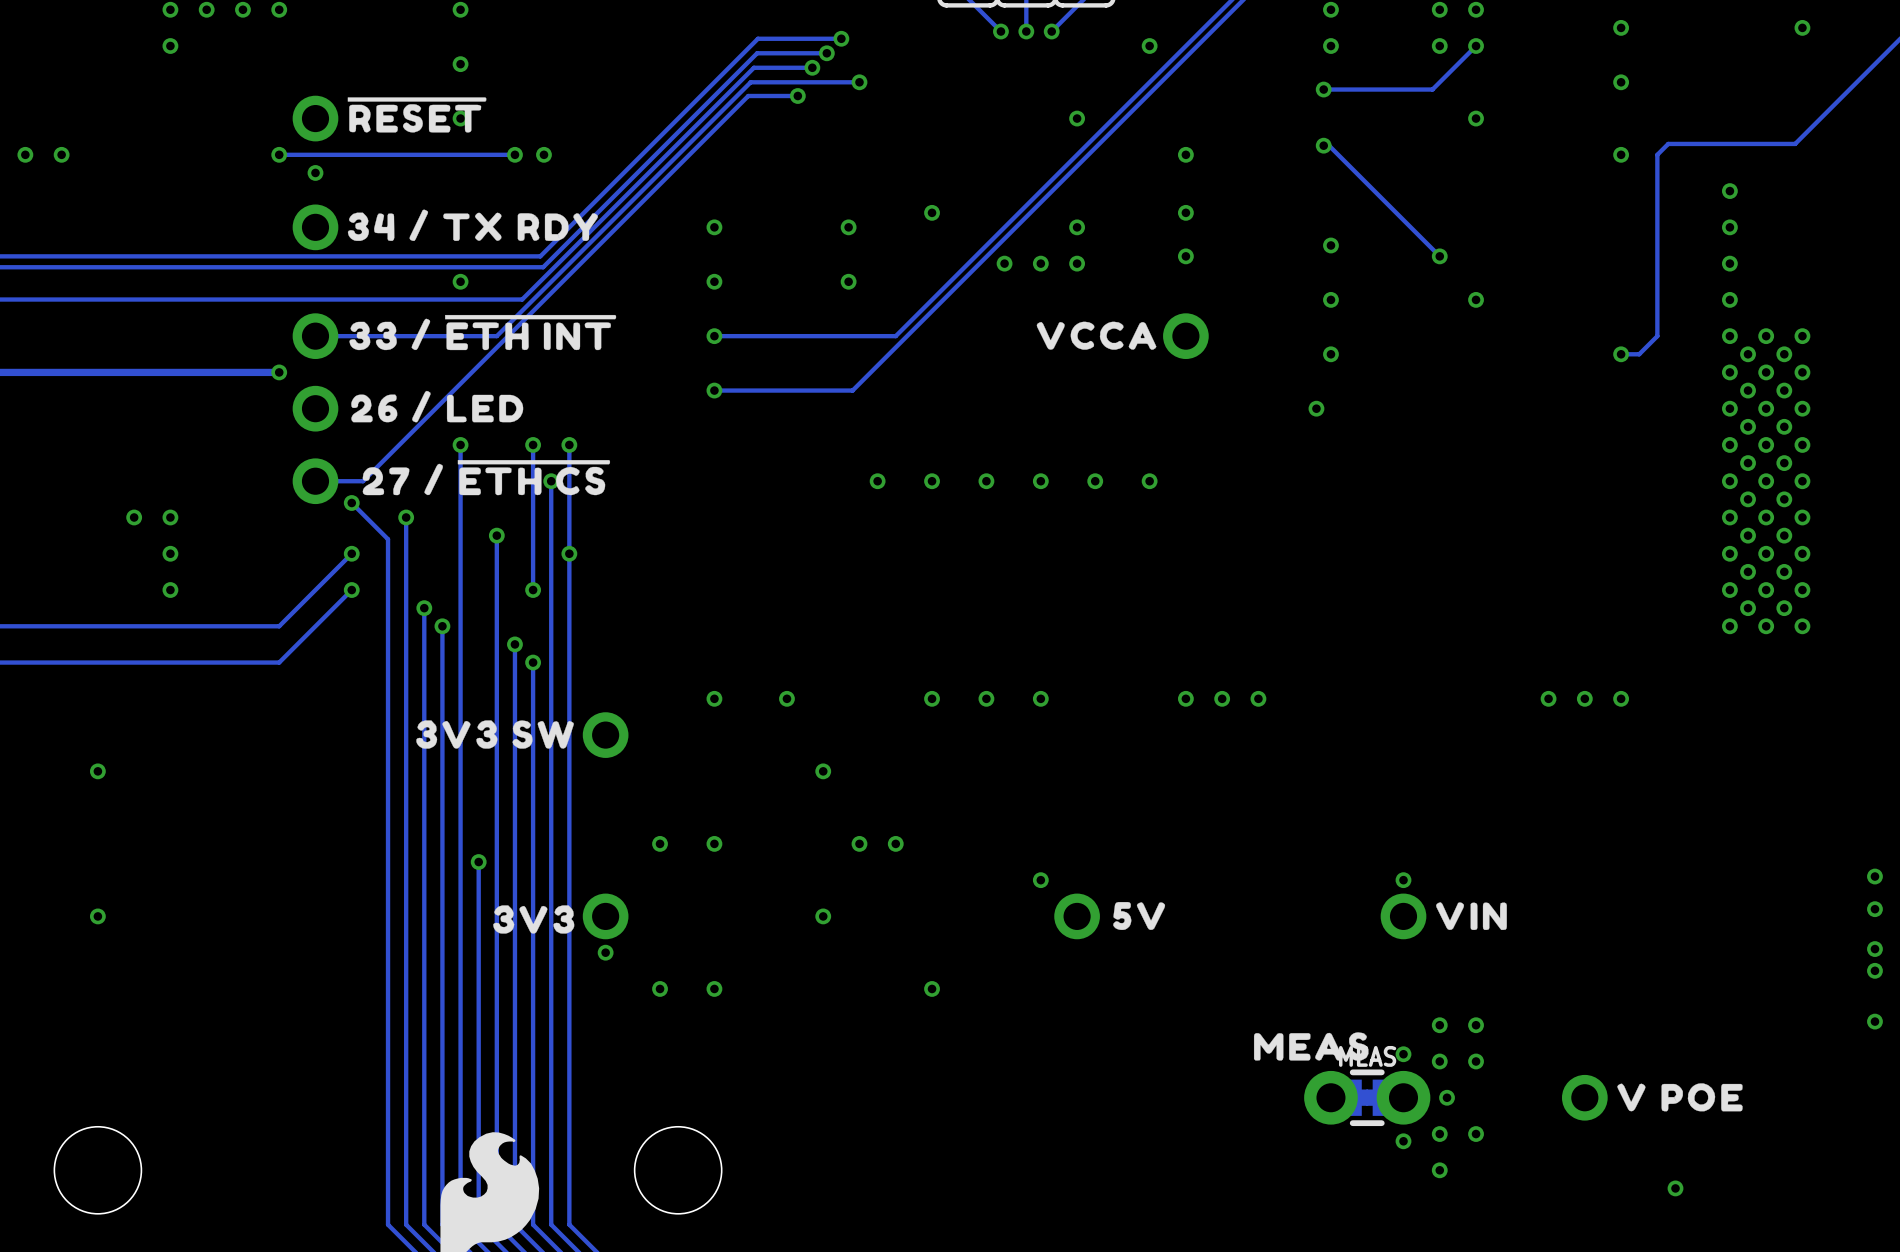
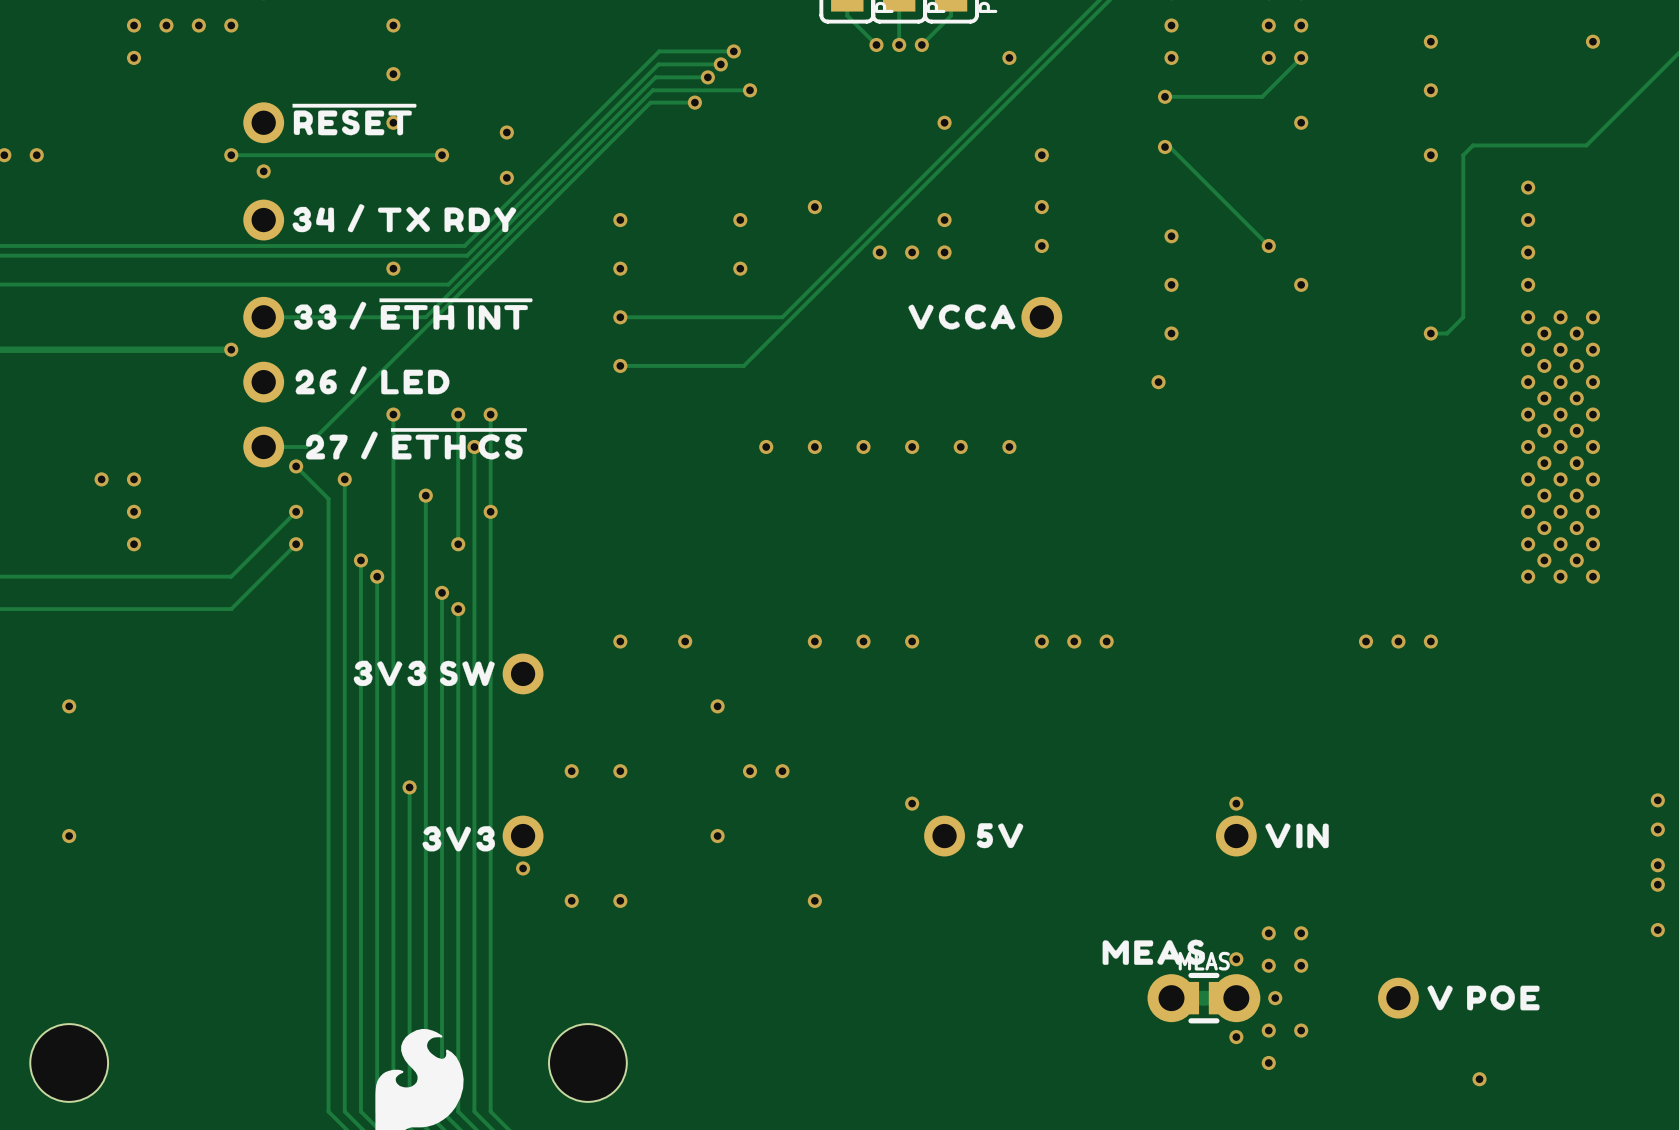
via: none -> (506, 132)
via: (543, 154) -> none
via: none -> (506, 177)

